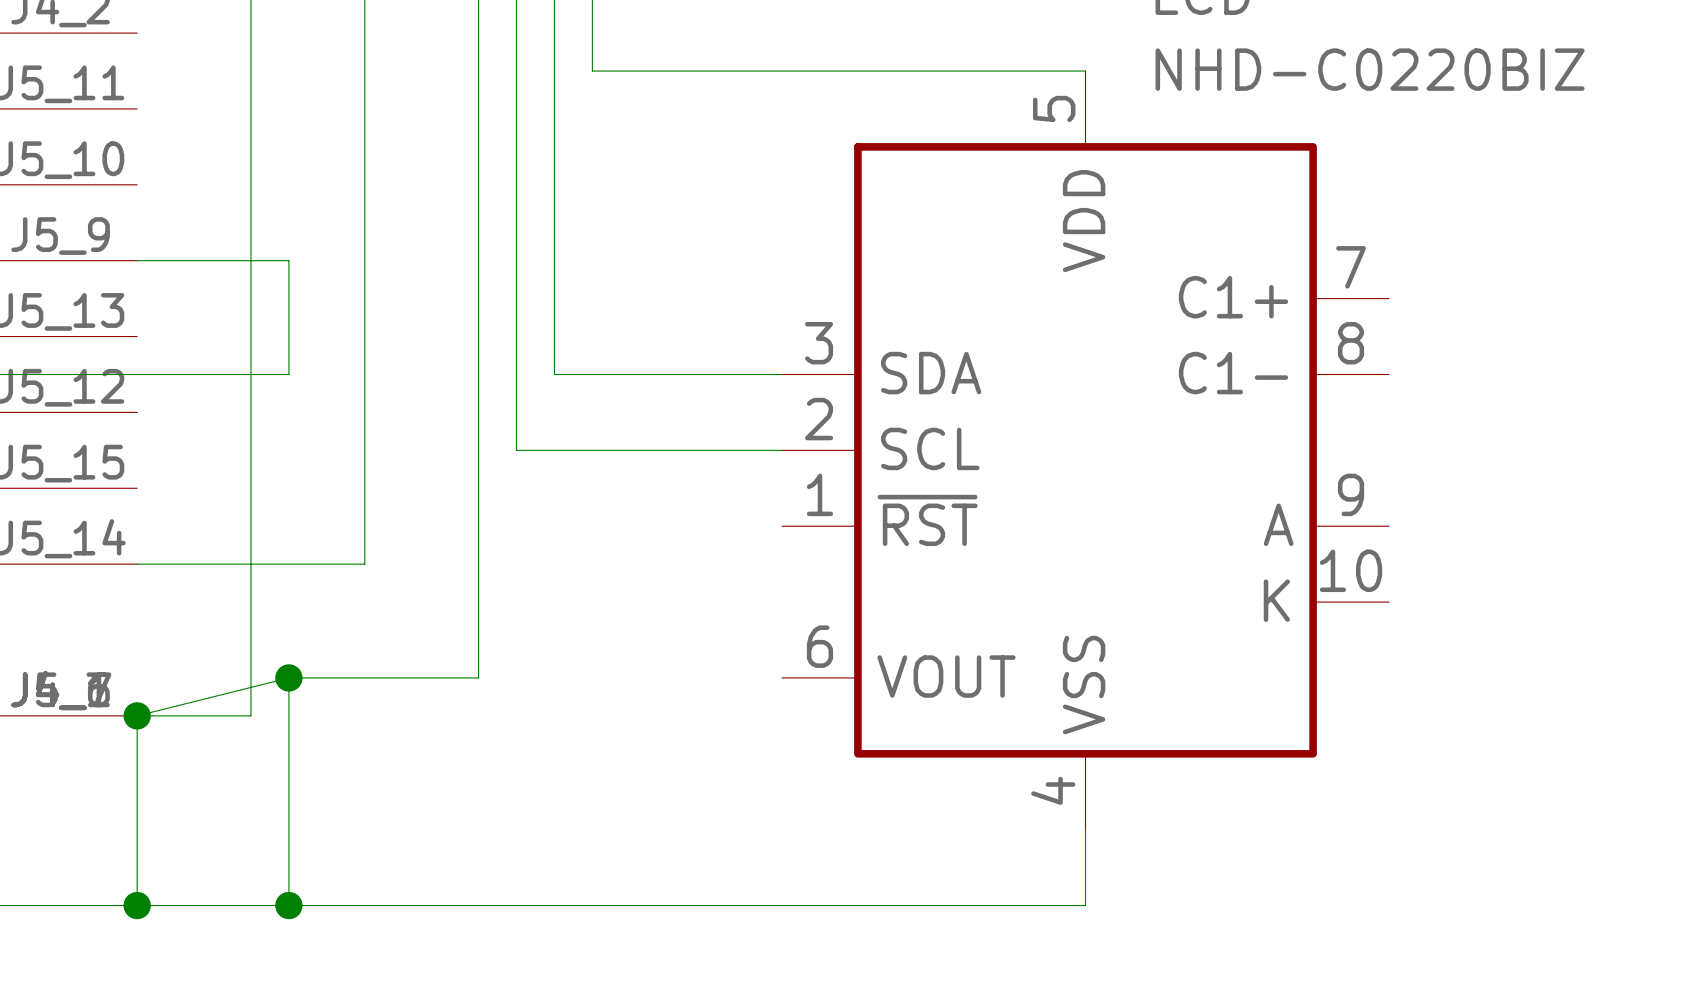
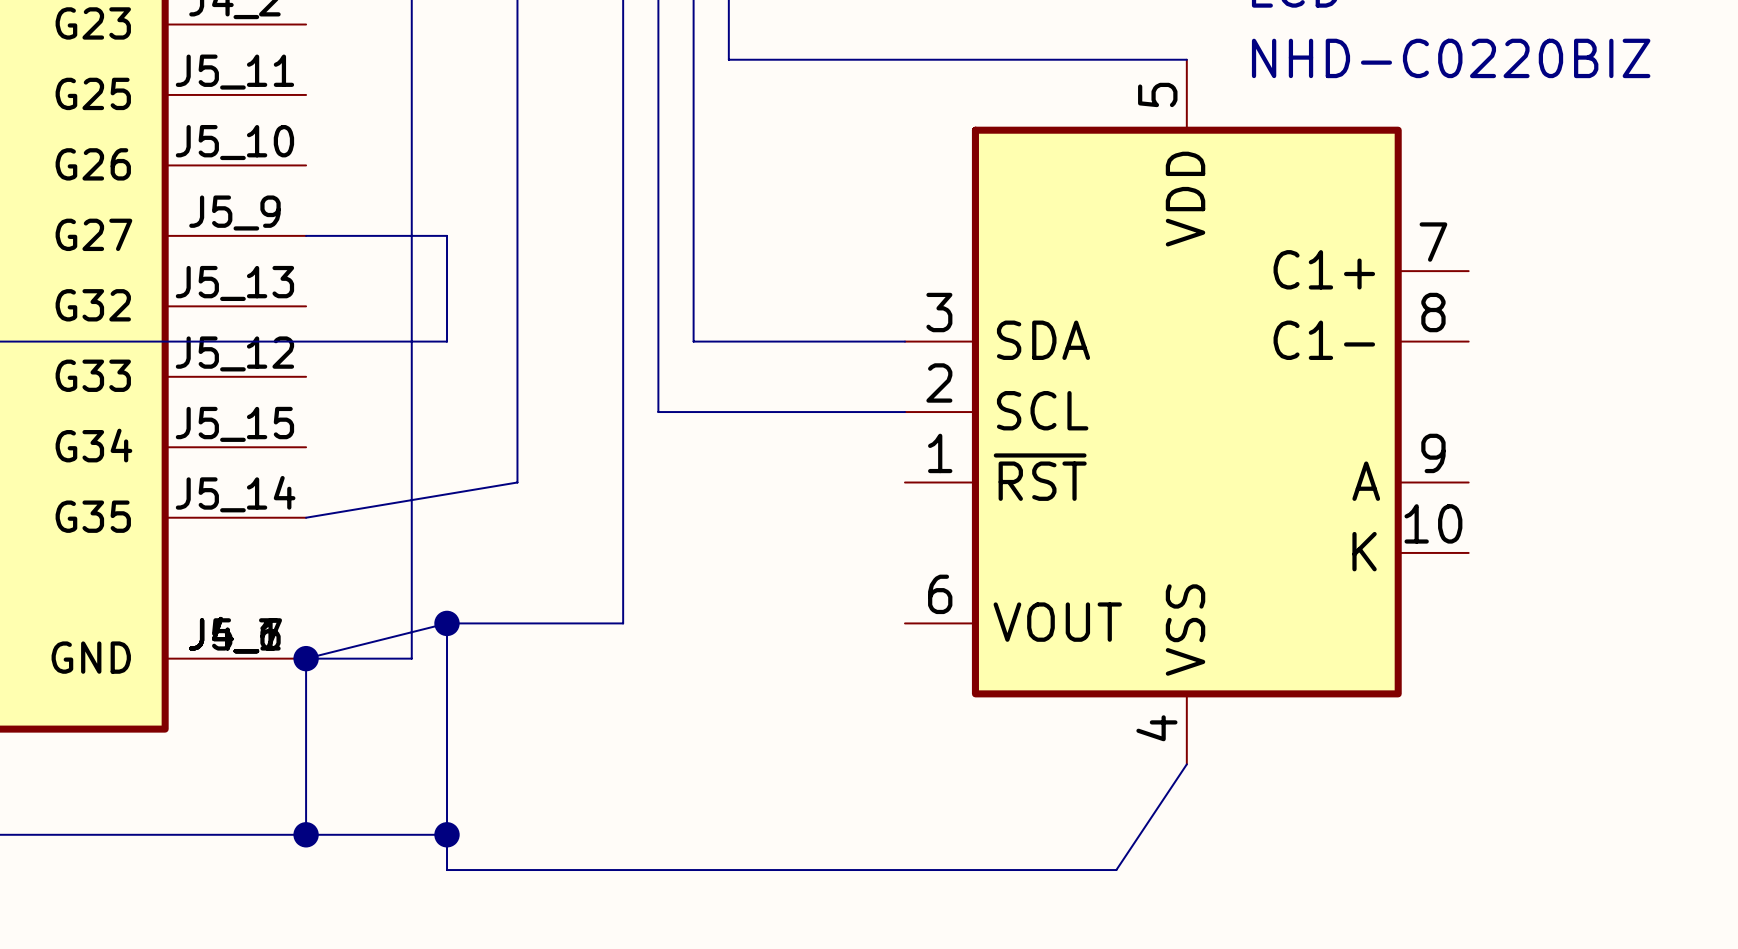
wire: (364, 526) (364, 564) (137, 564) -> (517, 482) (306, 517)
wire: (1085, 829) (1085, 905) (288, 905) -> (1186, 764) (1116, 870) (447, 870) (447, 834)

